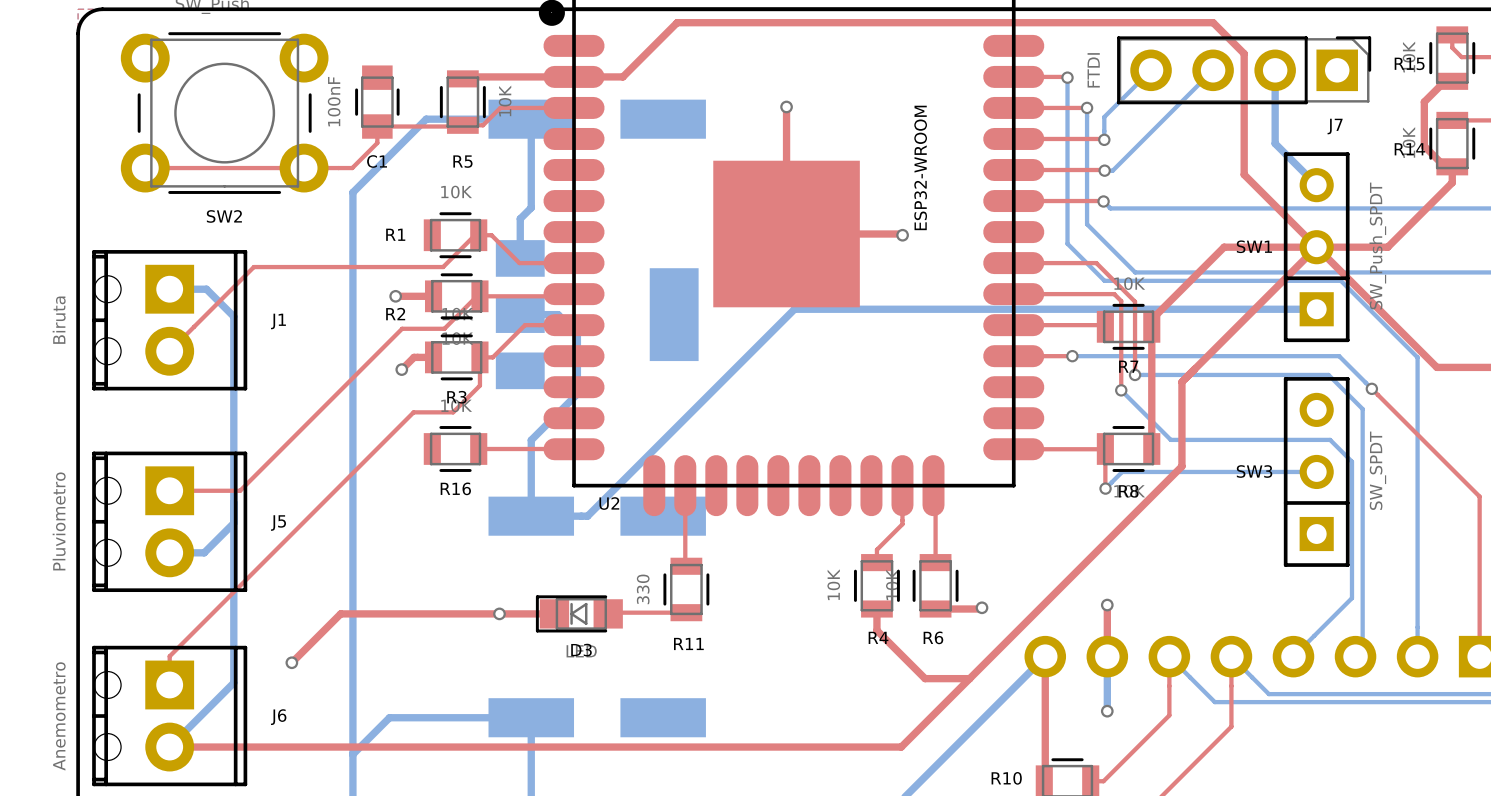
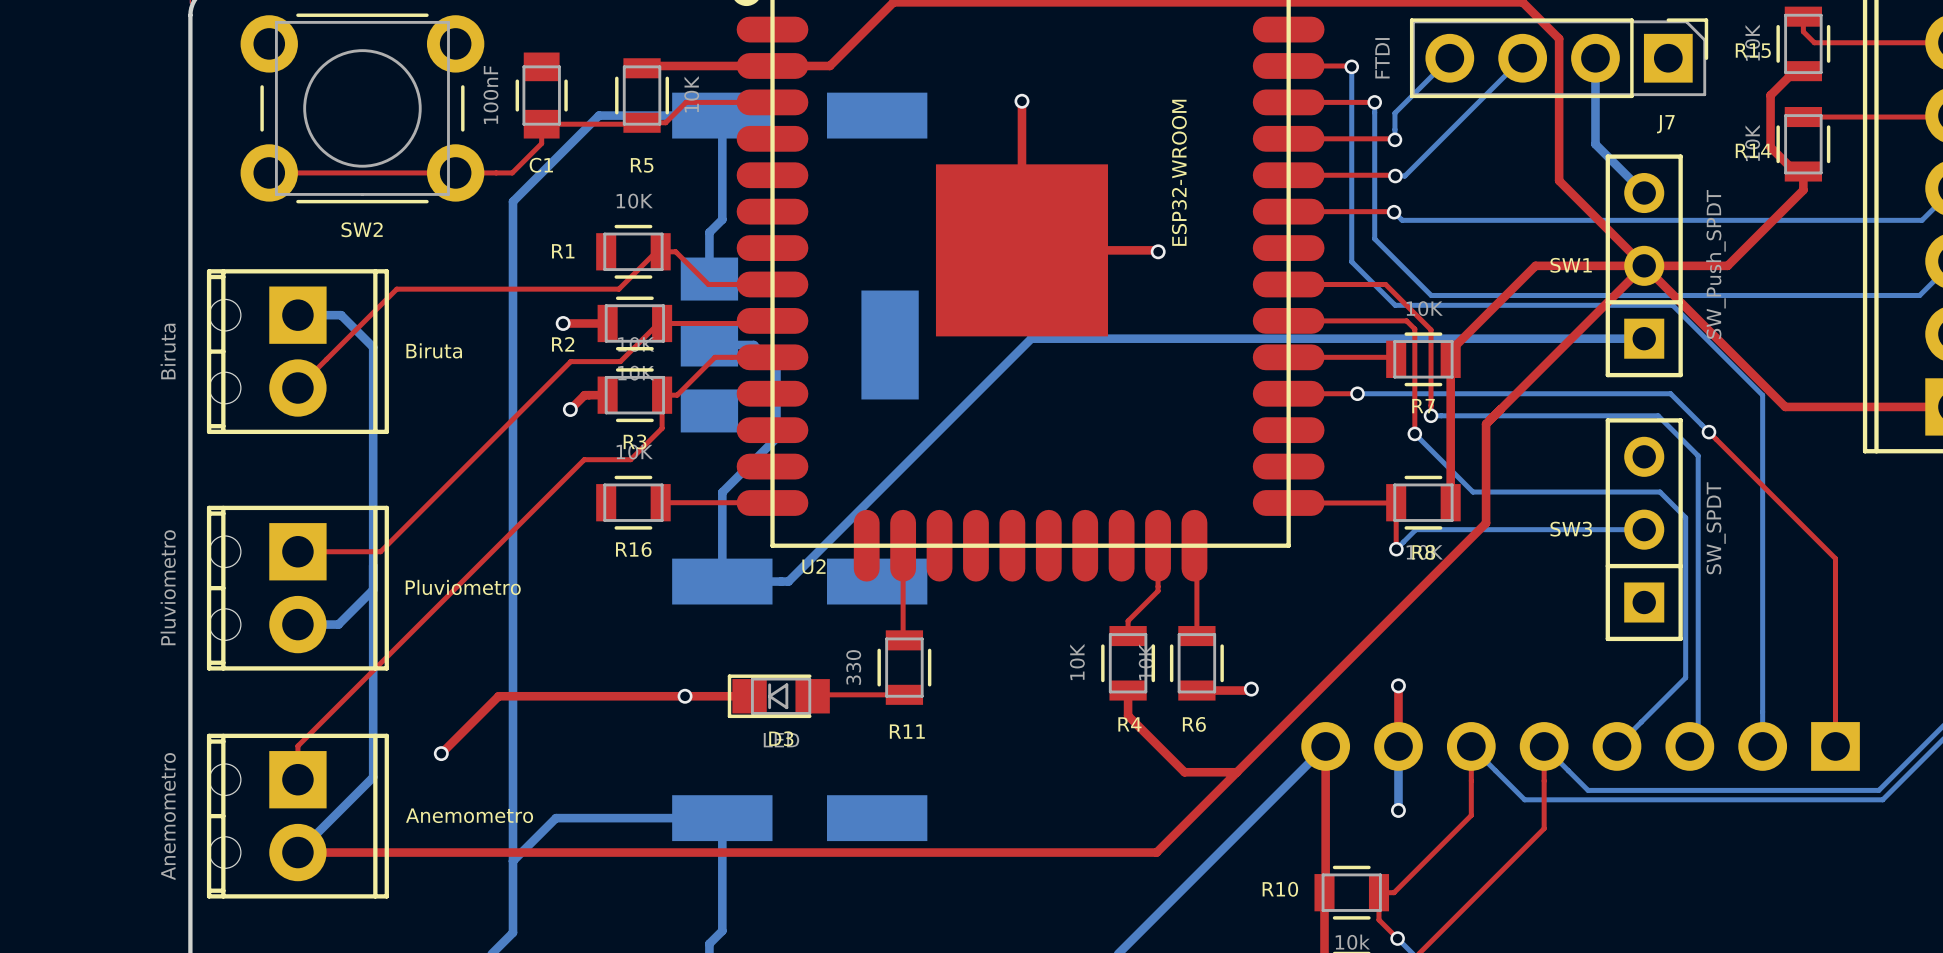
J1 name: J1 (278, 321) -> Biruta (434, 350)
J5 name: J5 (278, 523) -> Pluviometro (463, 587)
J6 name: J6 (278, 717) -> Anemometro (469, 815)

